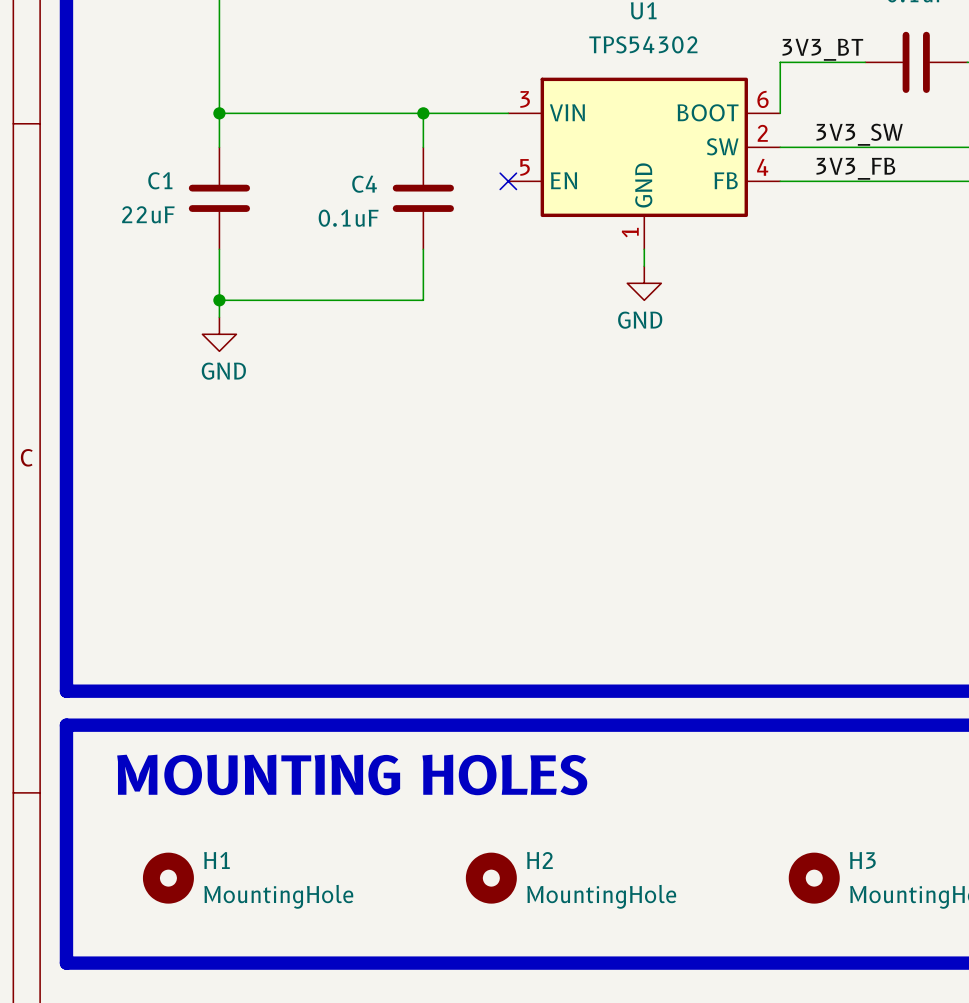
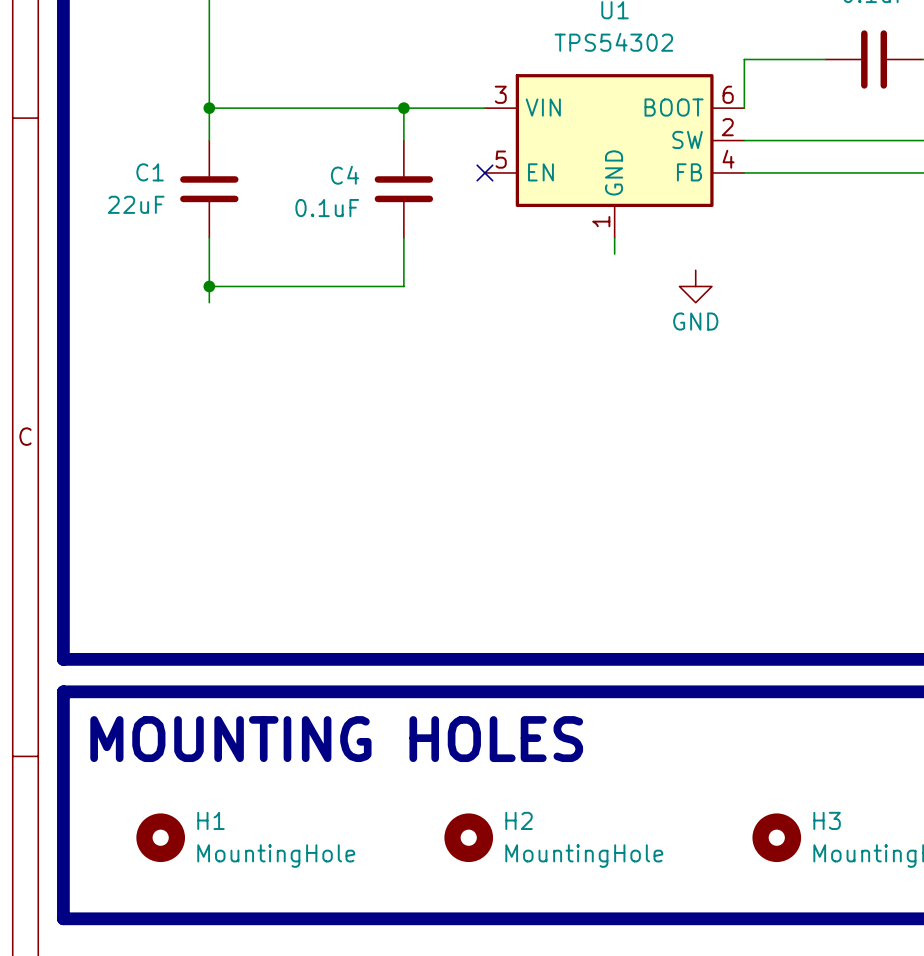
label: 3V3_BT (822, 49) -> none
label: 3V3_SW (859, 134) -> none
label: 3V3_FB (855, 168) -> none
power symbol position: GND (644, 283) -> GND (695, 286)
power symbol: GND (219, 334) -> none

